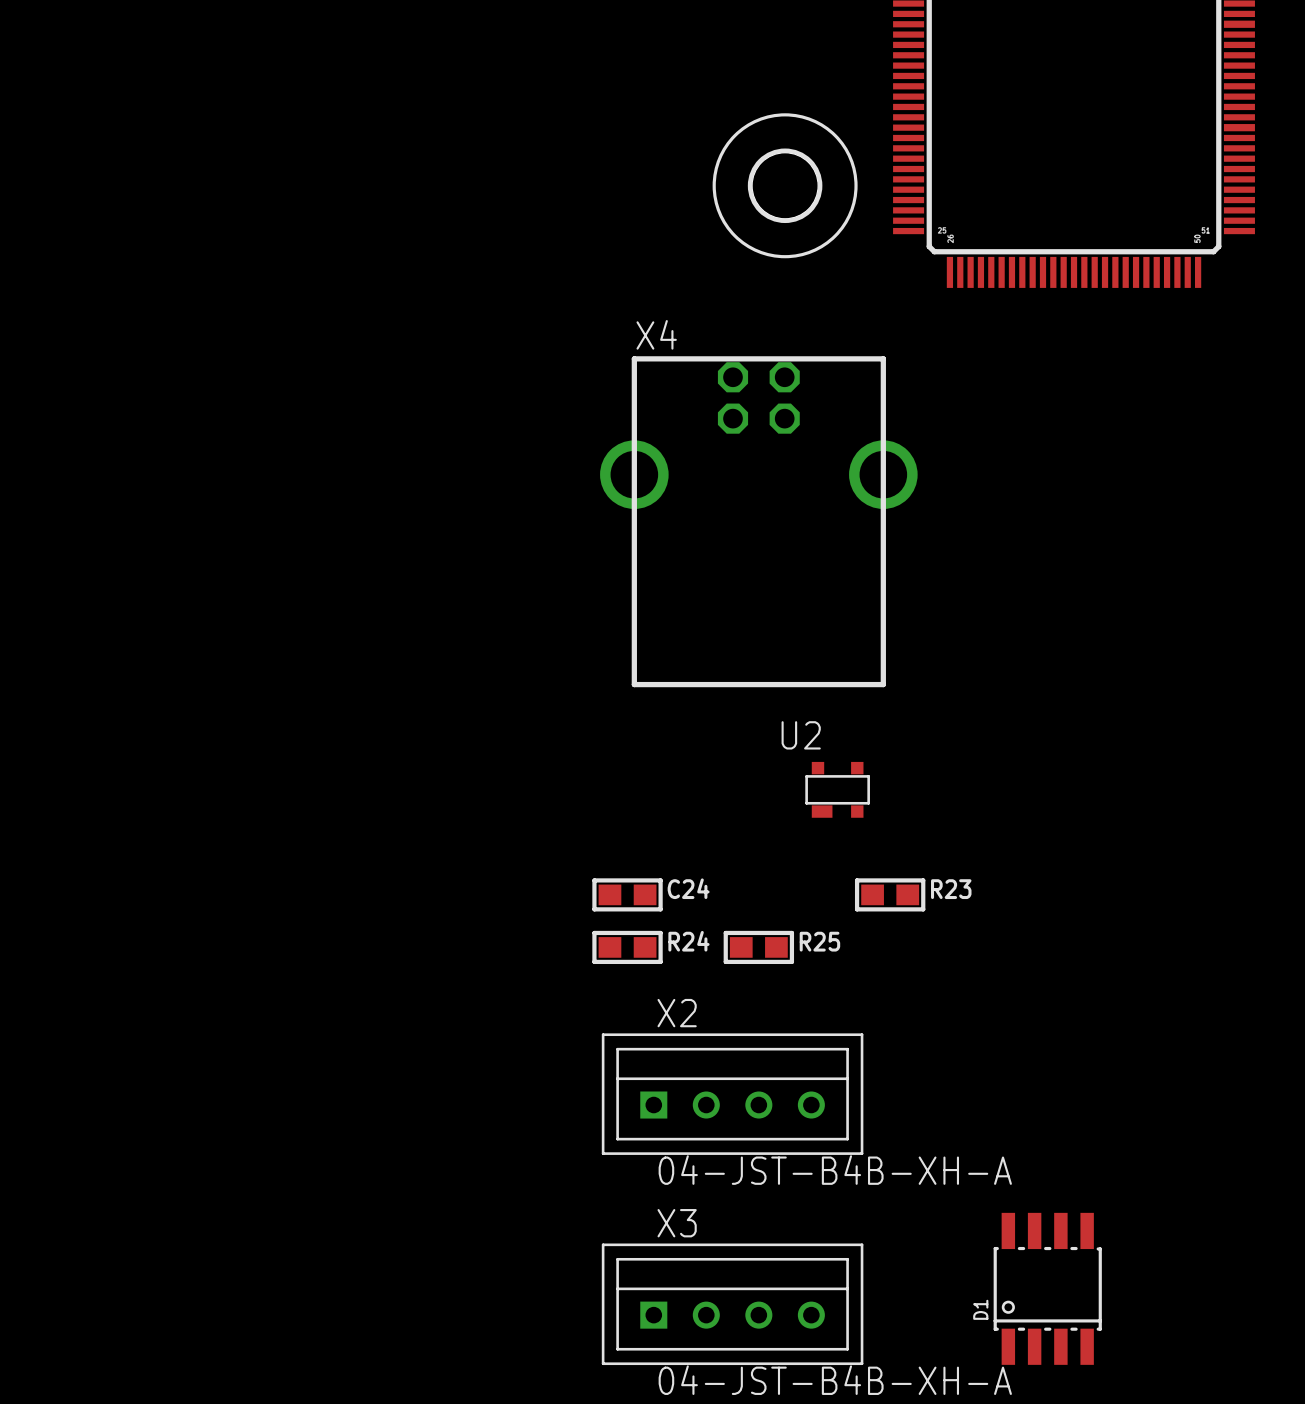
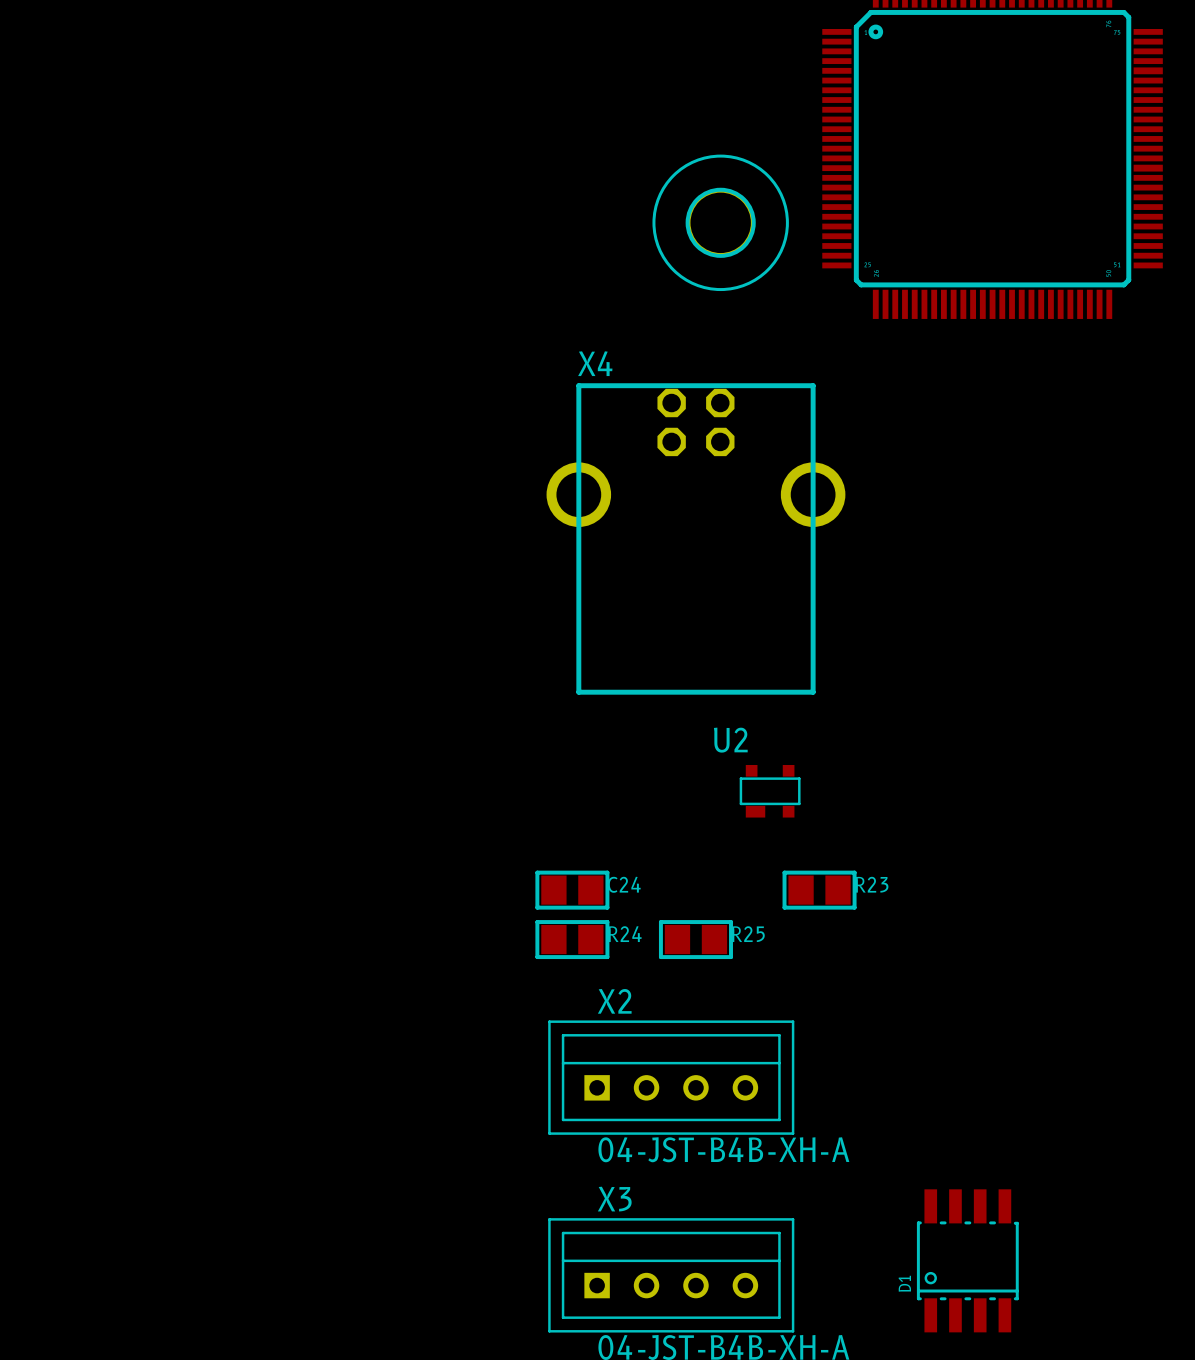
C24 footprint: [592, 878, 663, 912] -> [535, 870, 610, 910]
R23 footprint: [854, 878, 926, 912] -> [782, 870, 857, 910]
R24 footprint: [592, 930, 663, 965] -> [535, 920, 610, 960]
R25 footprint: [723, 930, 795, 965] -> [658, 920, 733, 960]

